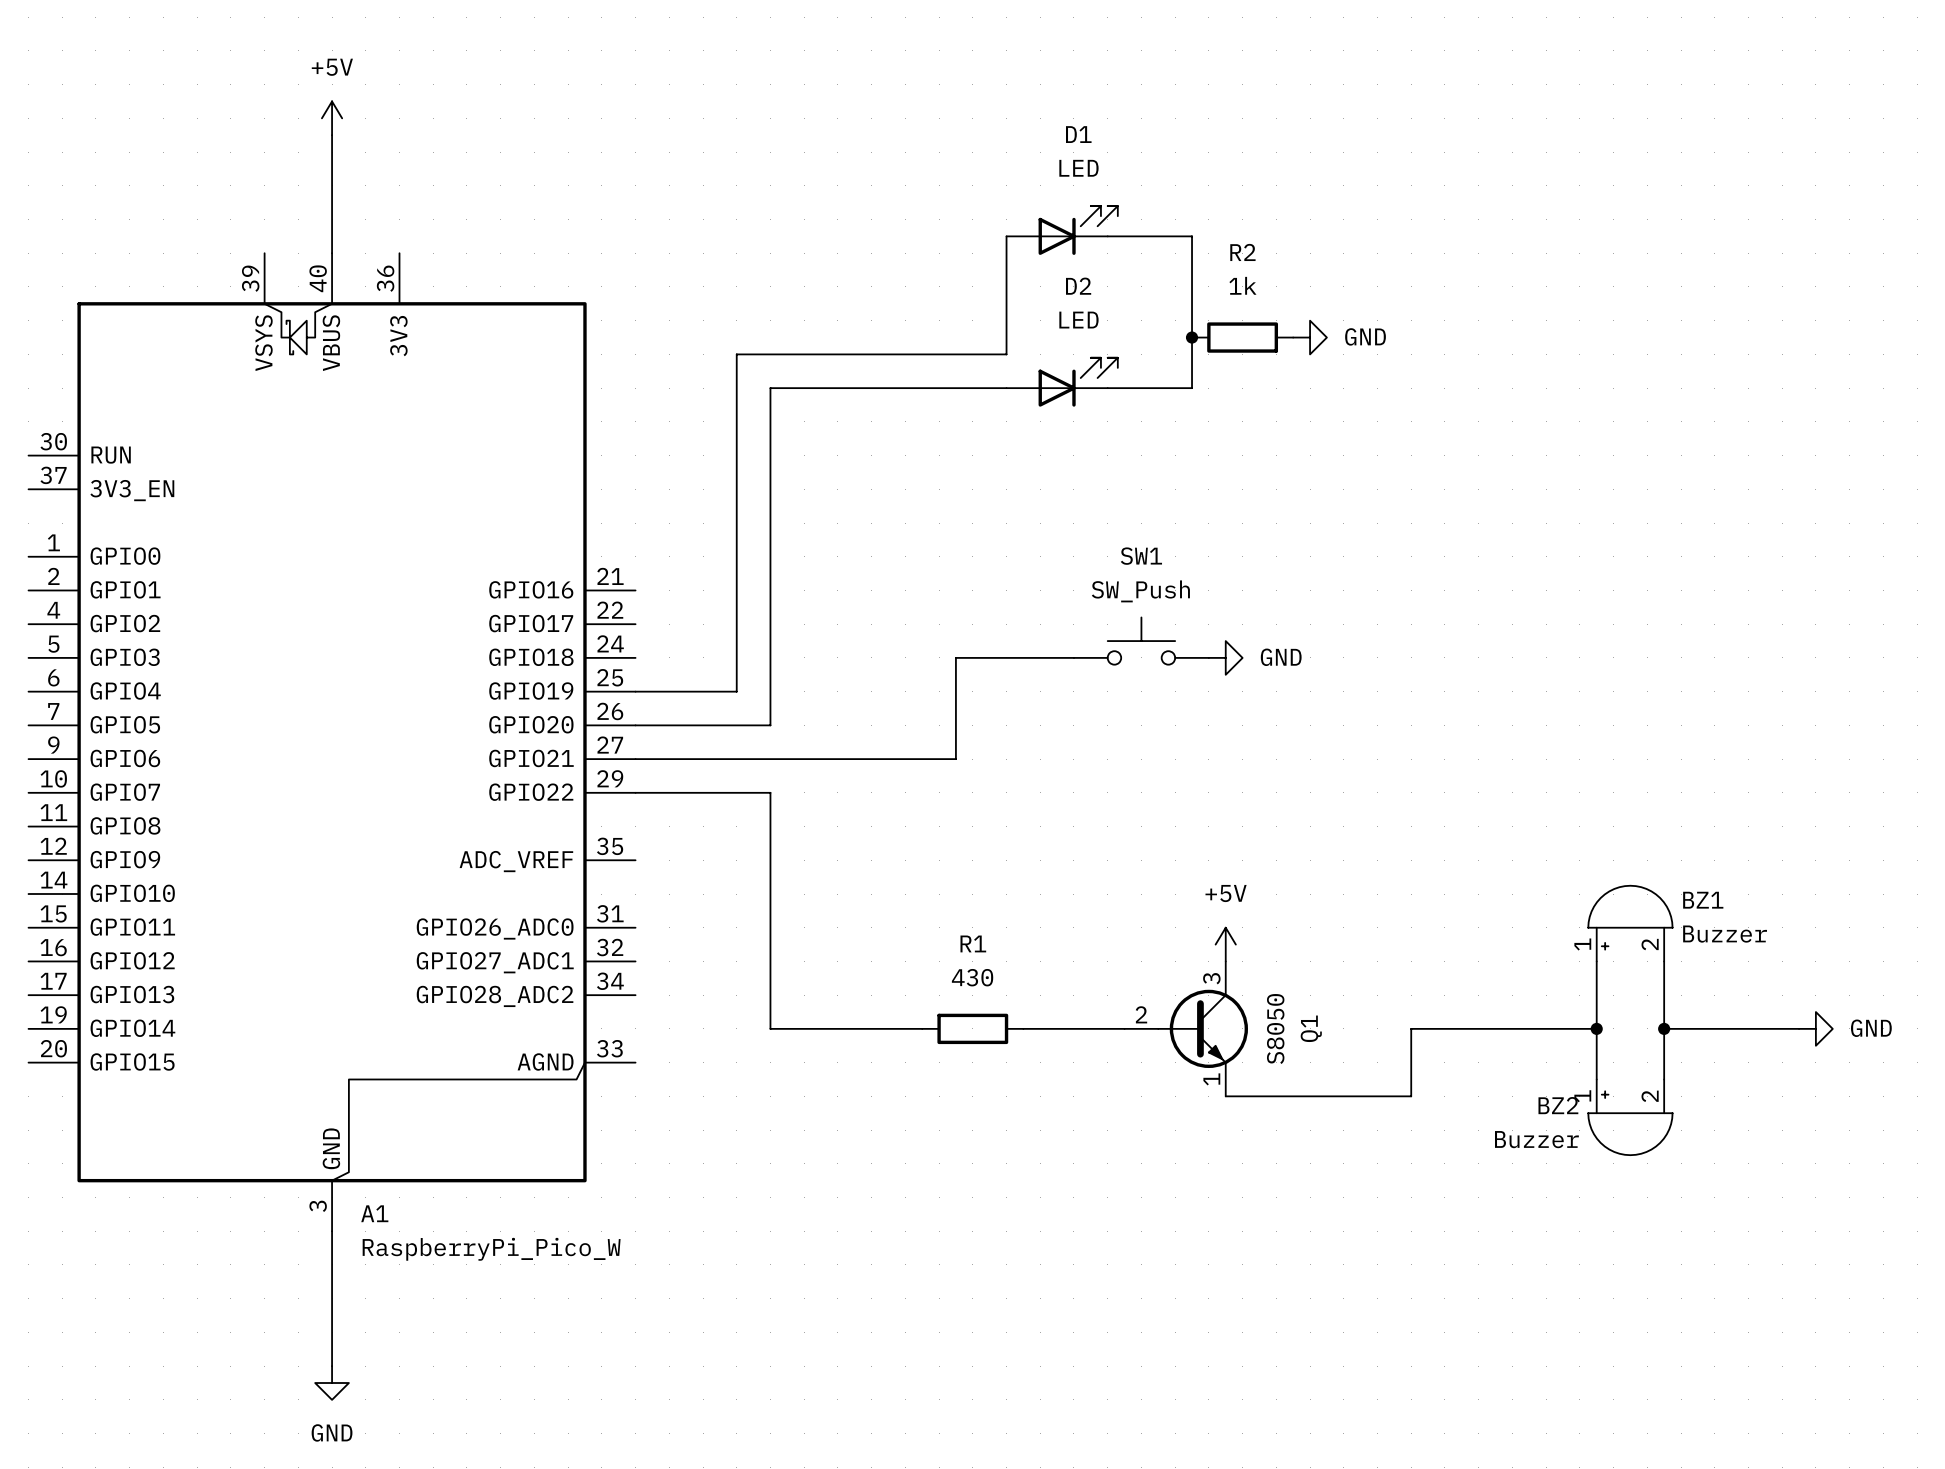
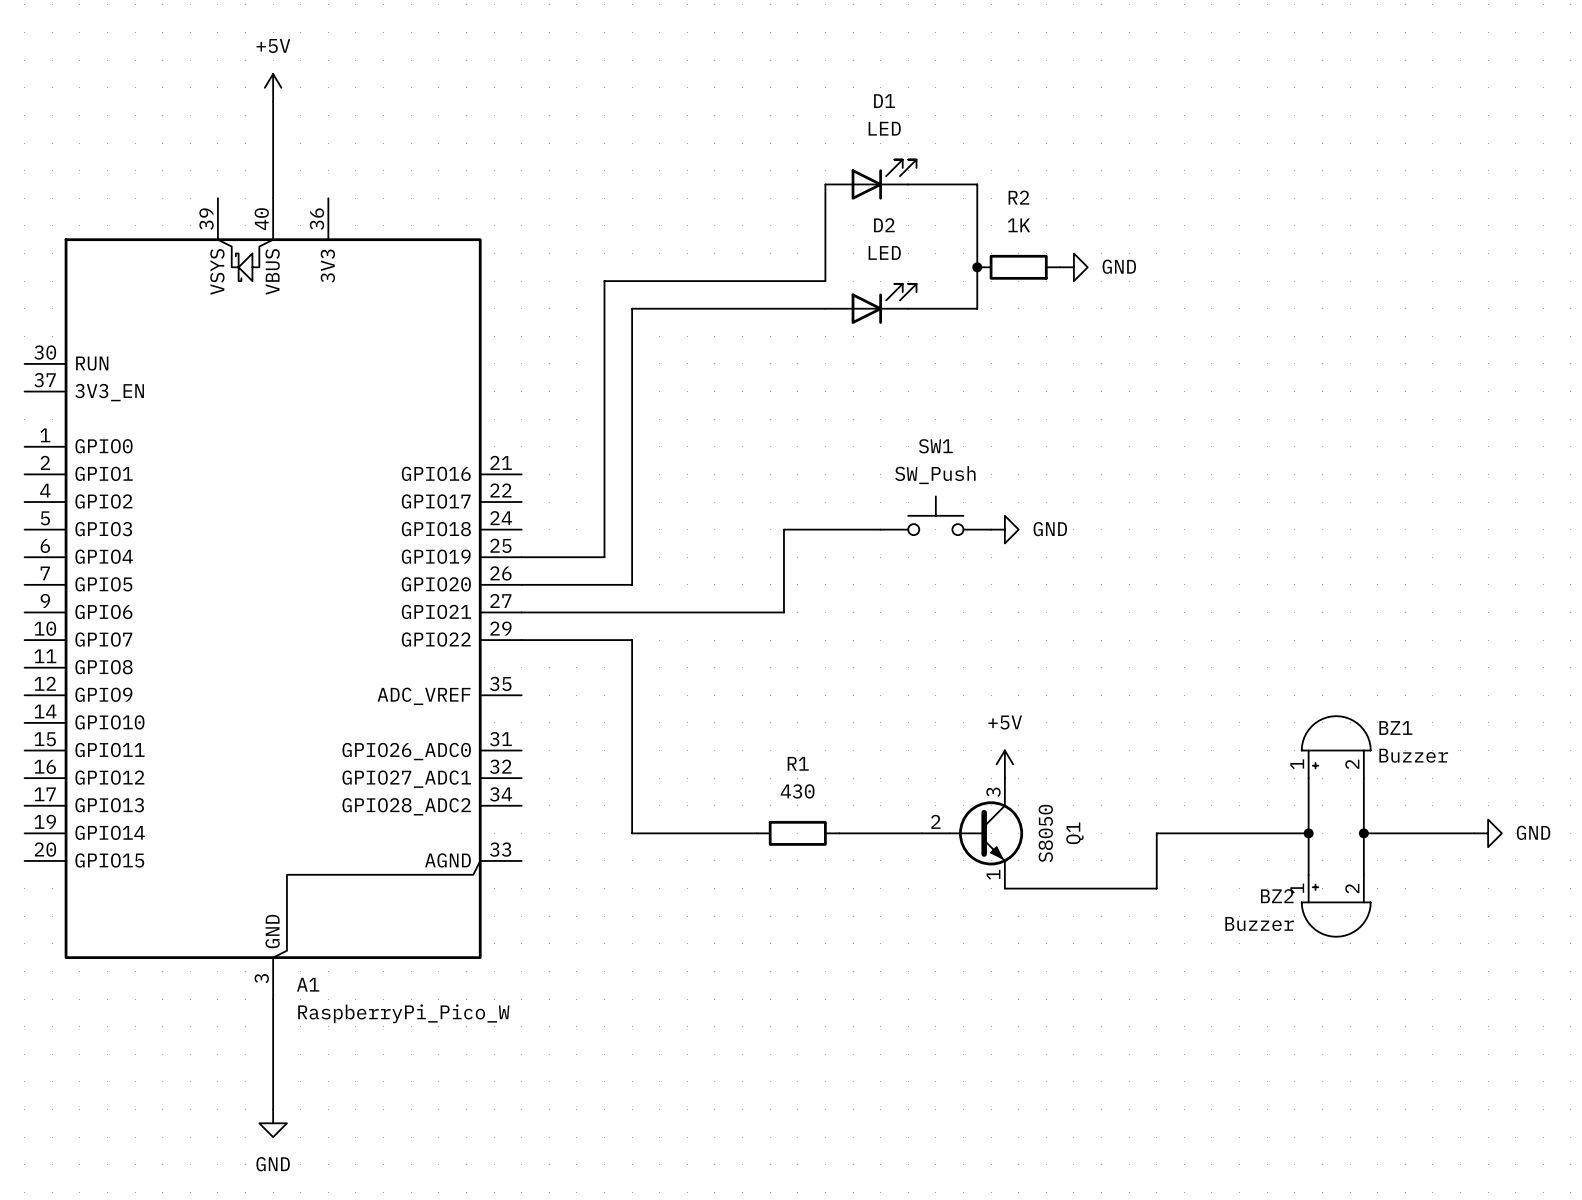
R2 value: 1k (1242, 285) -> 1K (1018, 225)

